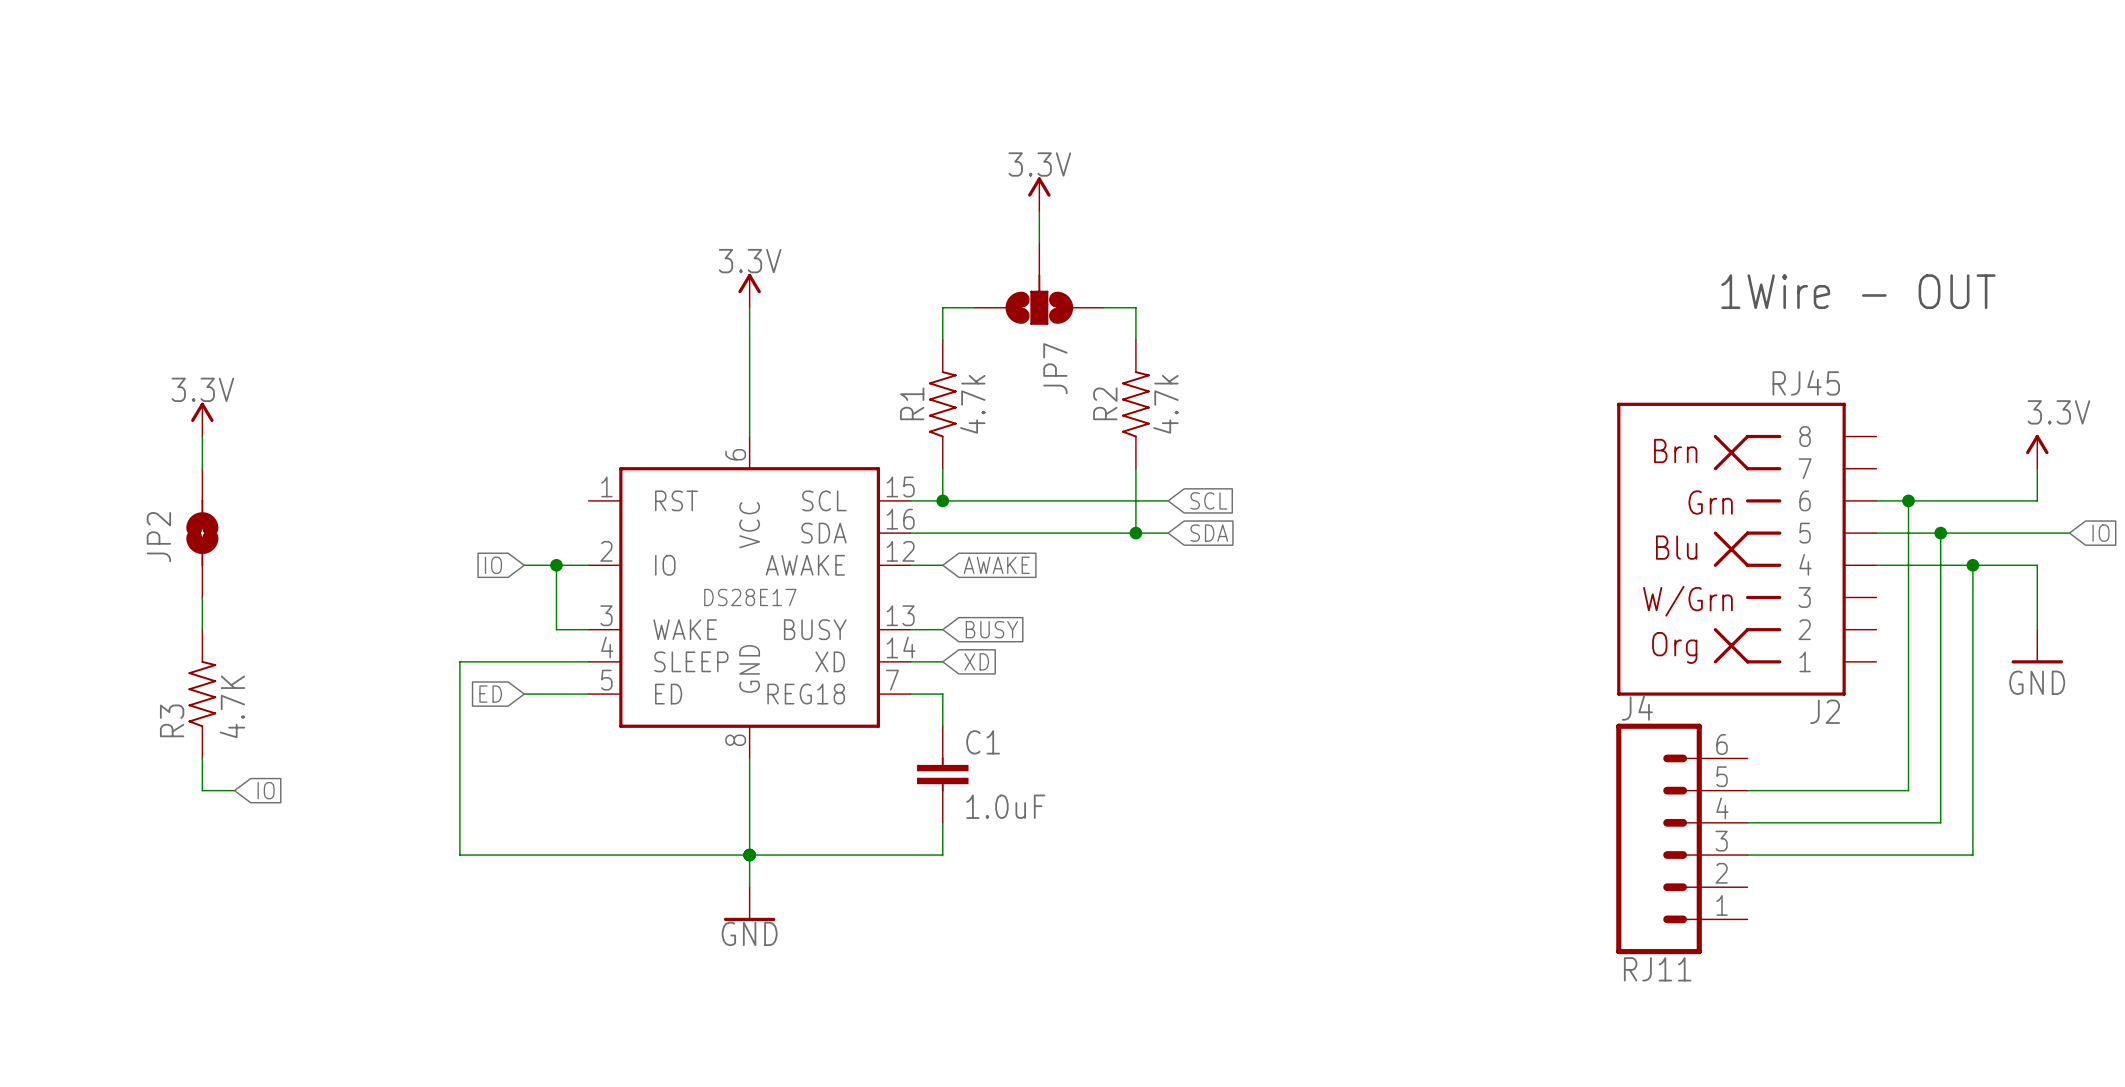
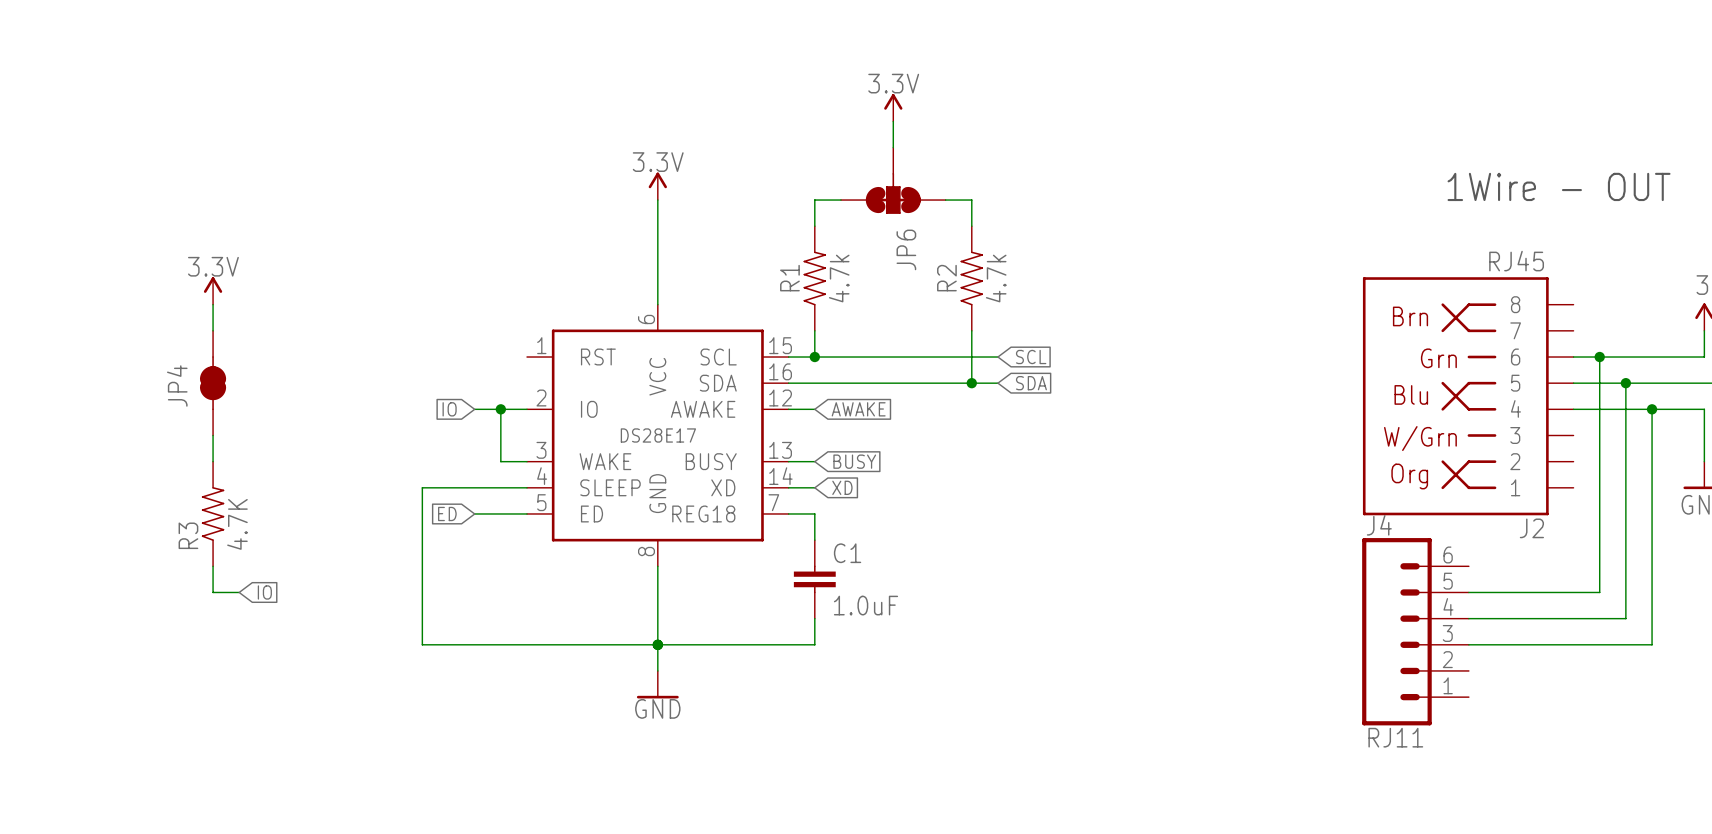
JP7: (1039, 284) -> none
JP6: none -> (893, 180)
JP2: (202, 533) -> none
JP4: none -> (213, 383)

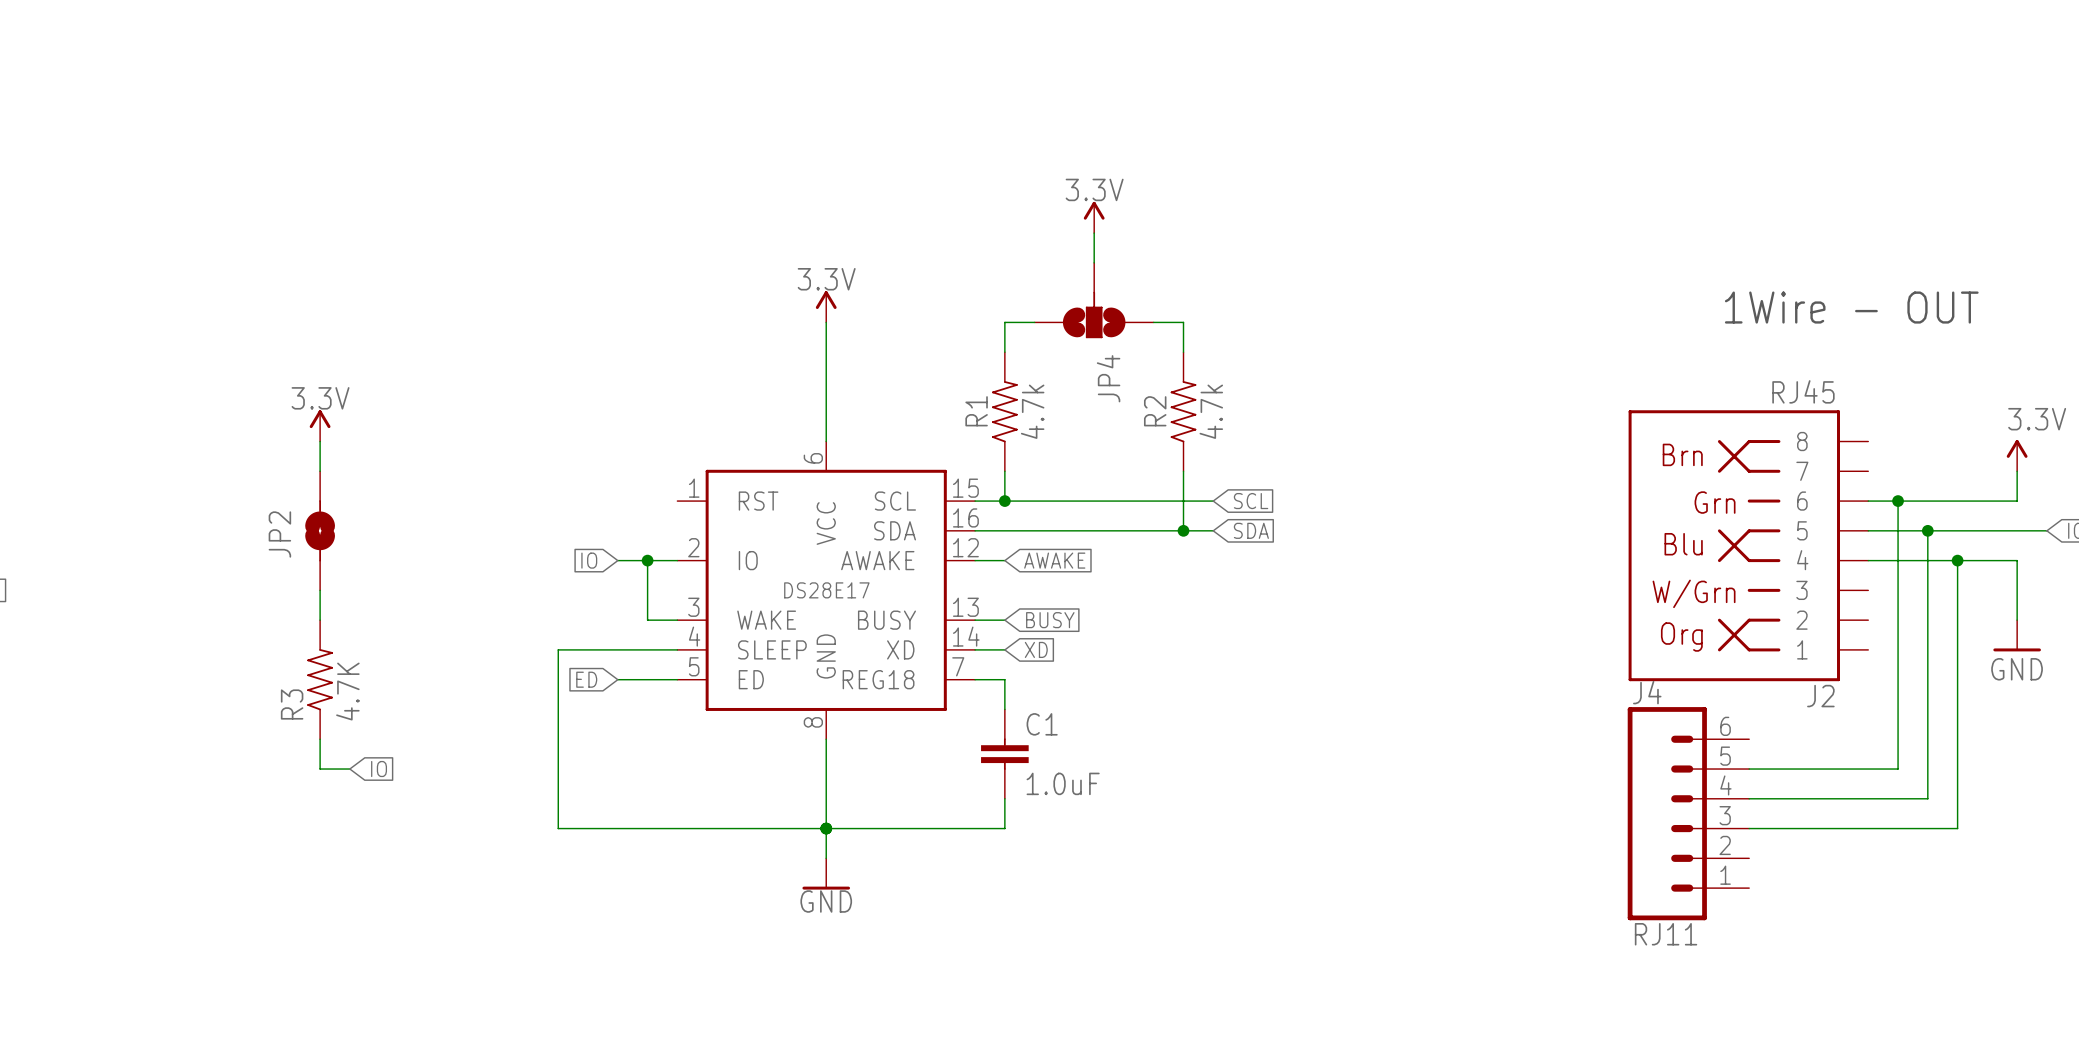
JP6: (893, 180) -> none
JP4 symbol: [199, 330, 227, 436] -> [1034, 262, 1154, 339]
JP2: none -> (320, 530)
JP4 name position: JP4 (177, 386) -> JP4 (1108, 378)

